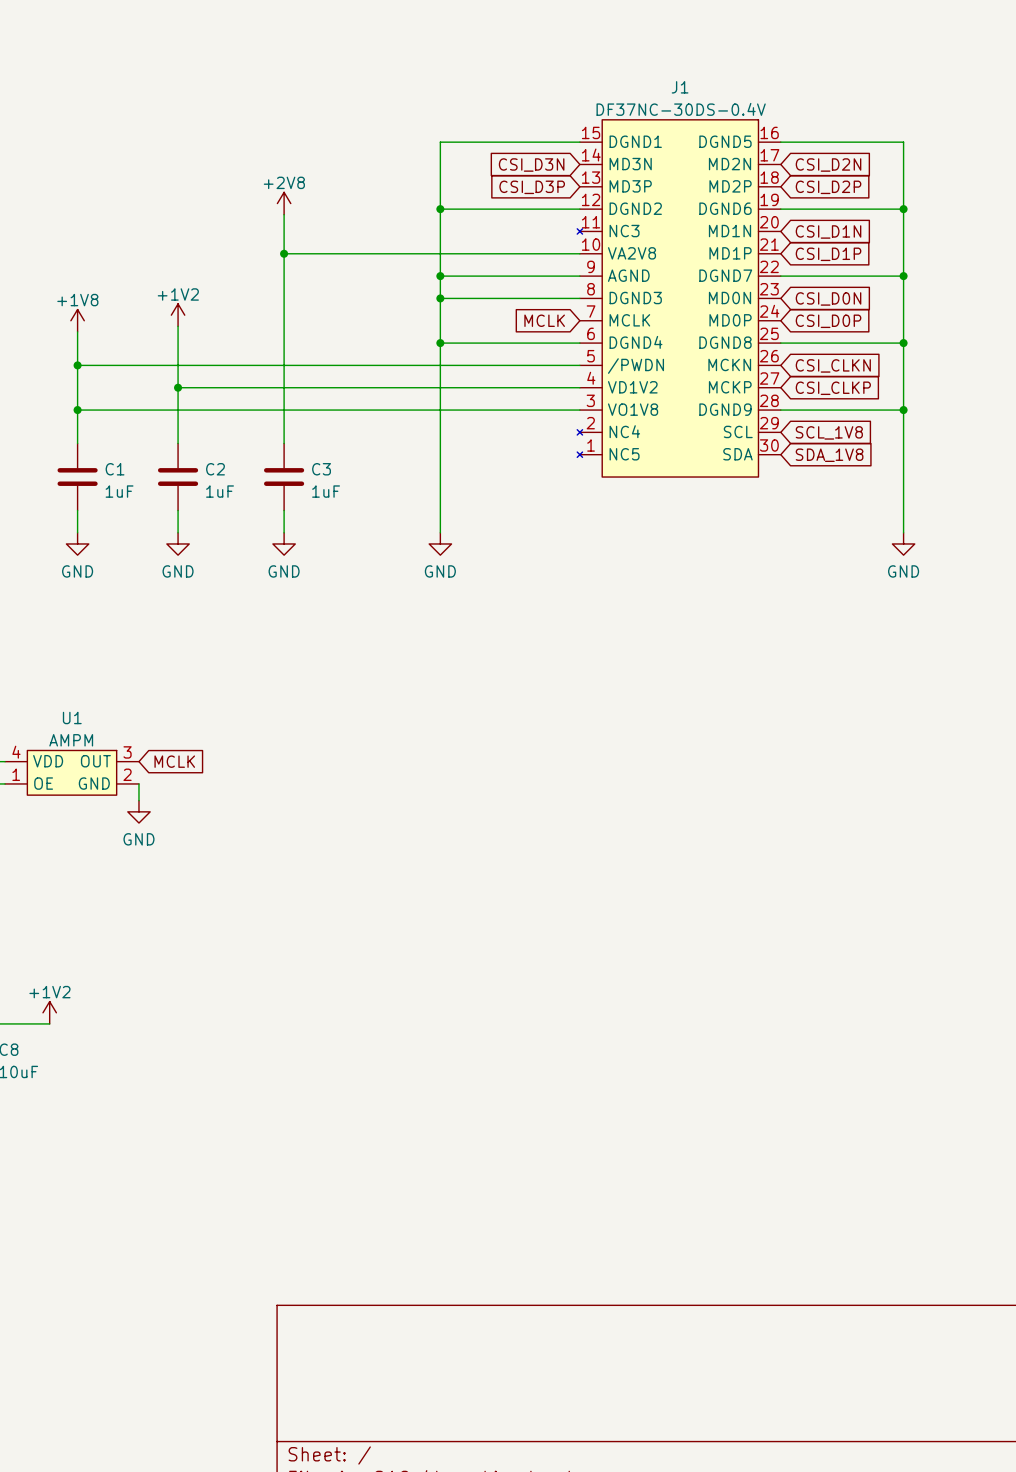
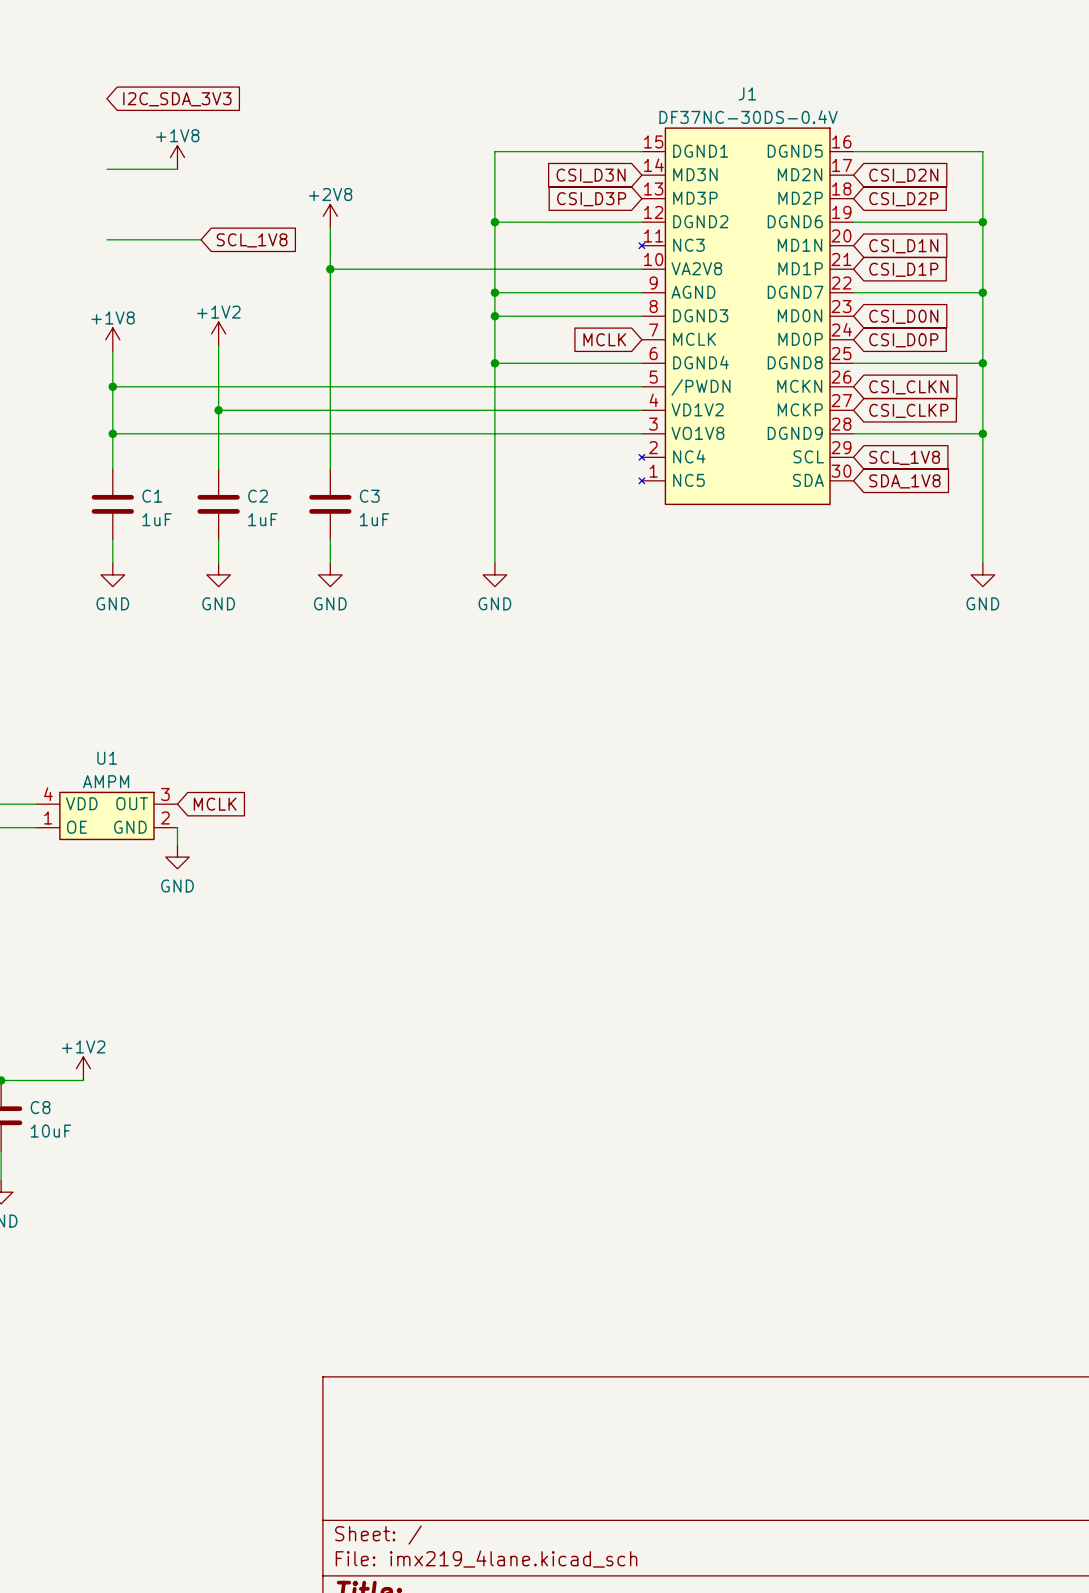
global label: none -> I2C_SDA_3V3 (177, 99)
power symbol: none -> +1V8 (177, 157)
wire: none -> (106, 169) (177, 169)
wire: none -> (106, 239) (200, 239)
global label: none -> SCL_1V8 (252, 240)

